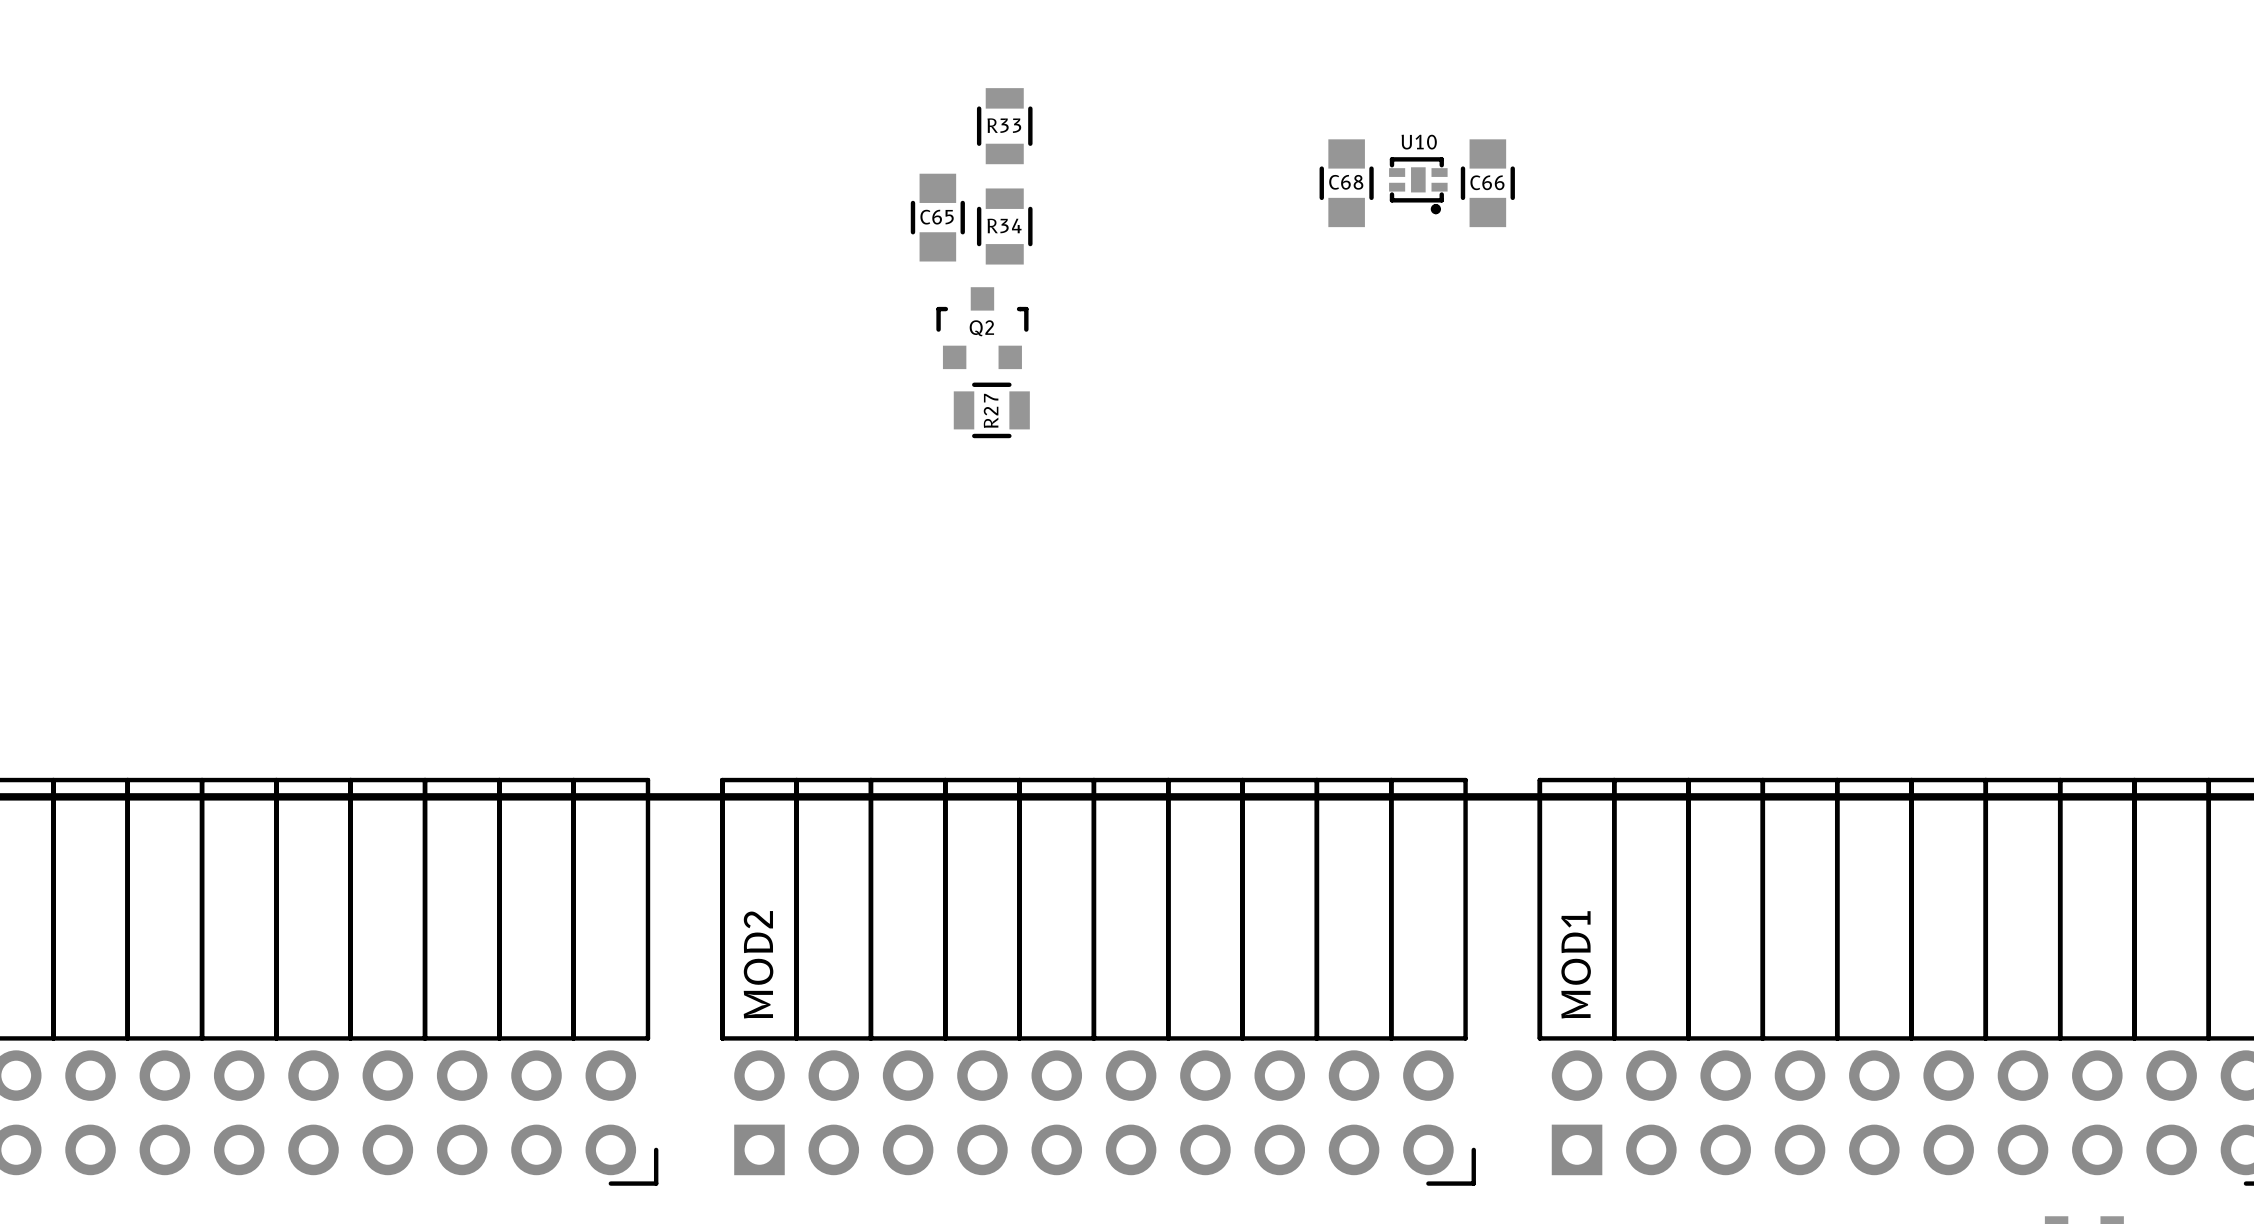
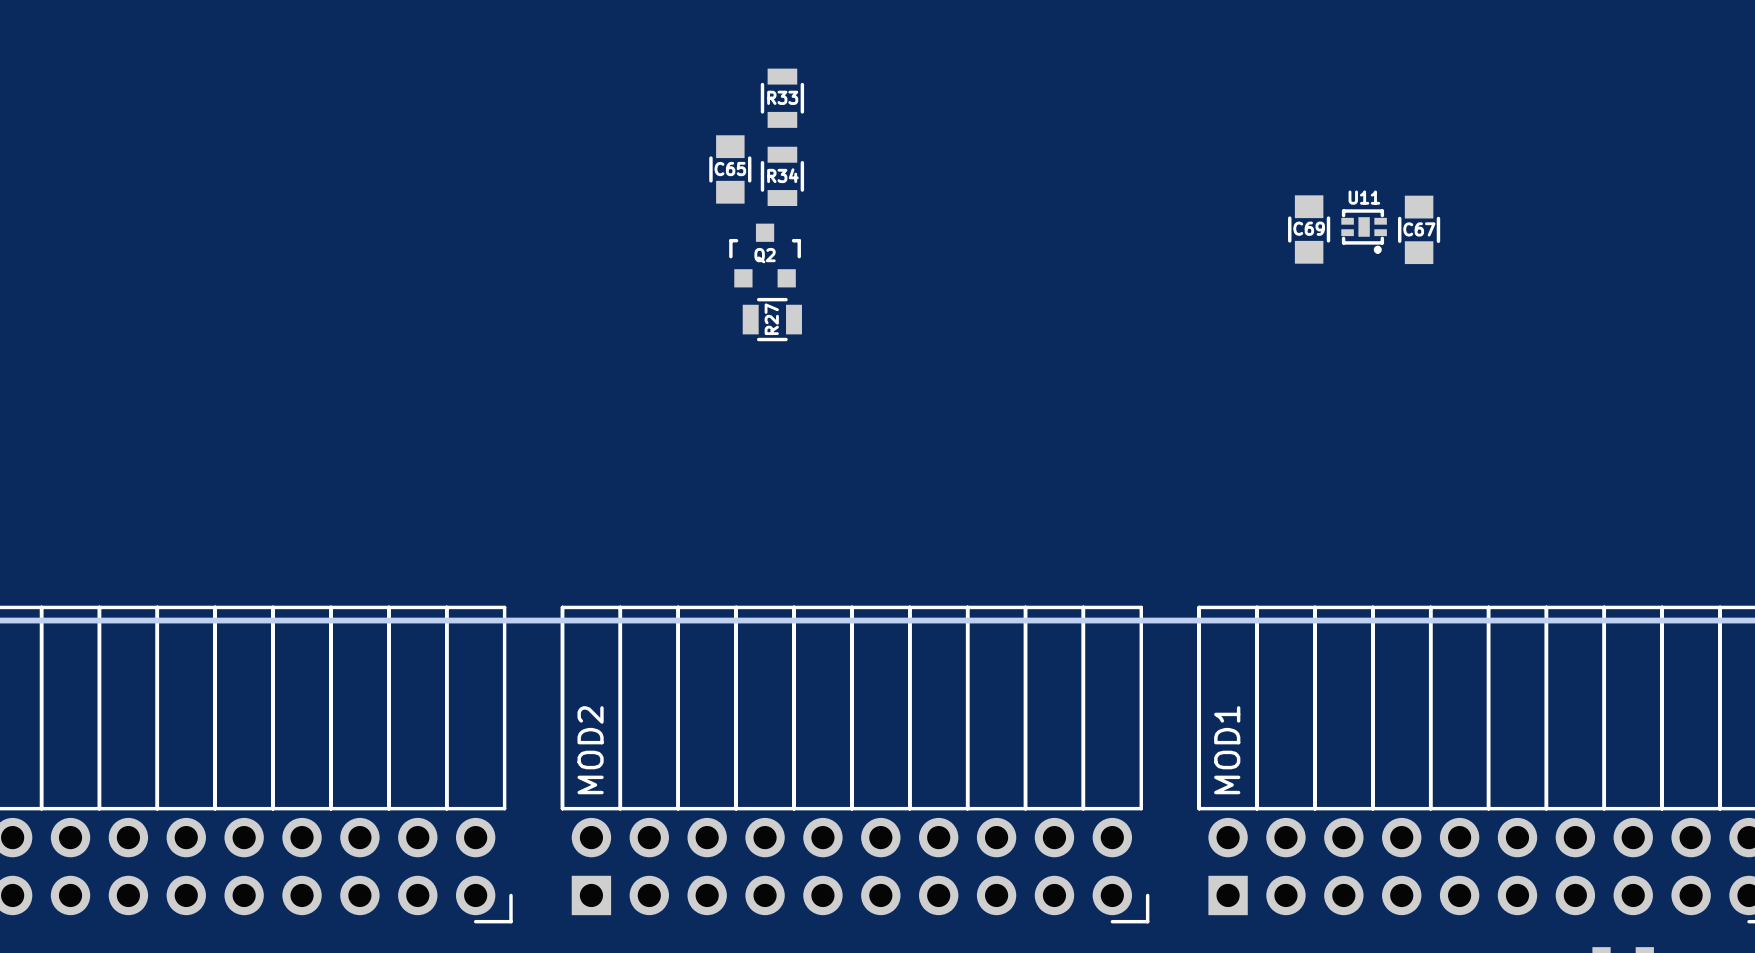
C68: (1346, 183) -> none
C66: (1487, 183) -> none
U10: (1418, 185) -> none
C69: none -> (1309, 229)
C67: none -> (1419, 229)
U11: none -> (1364, 231)

